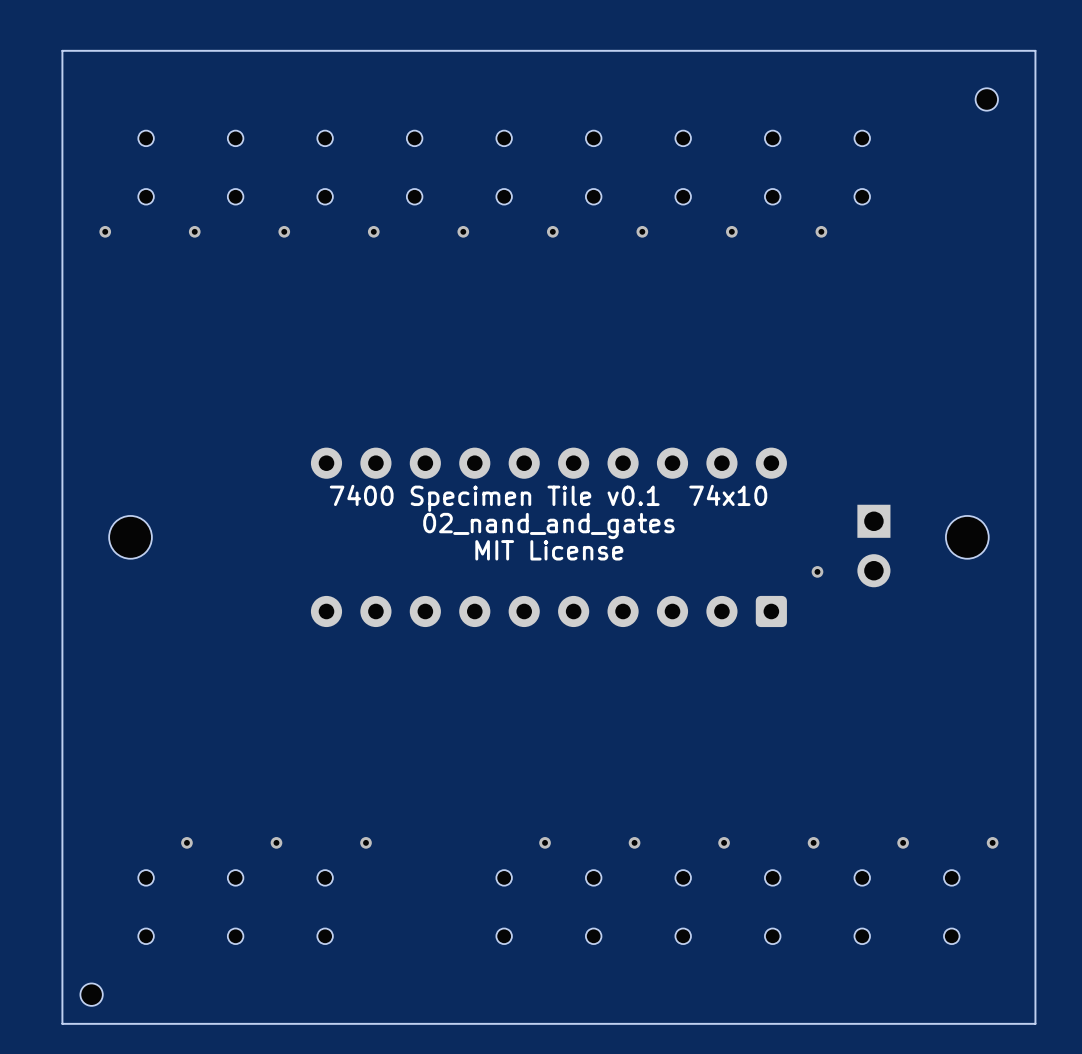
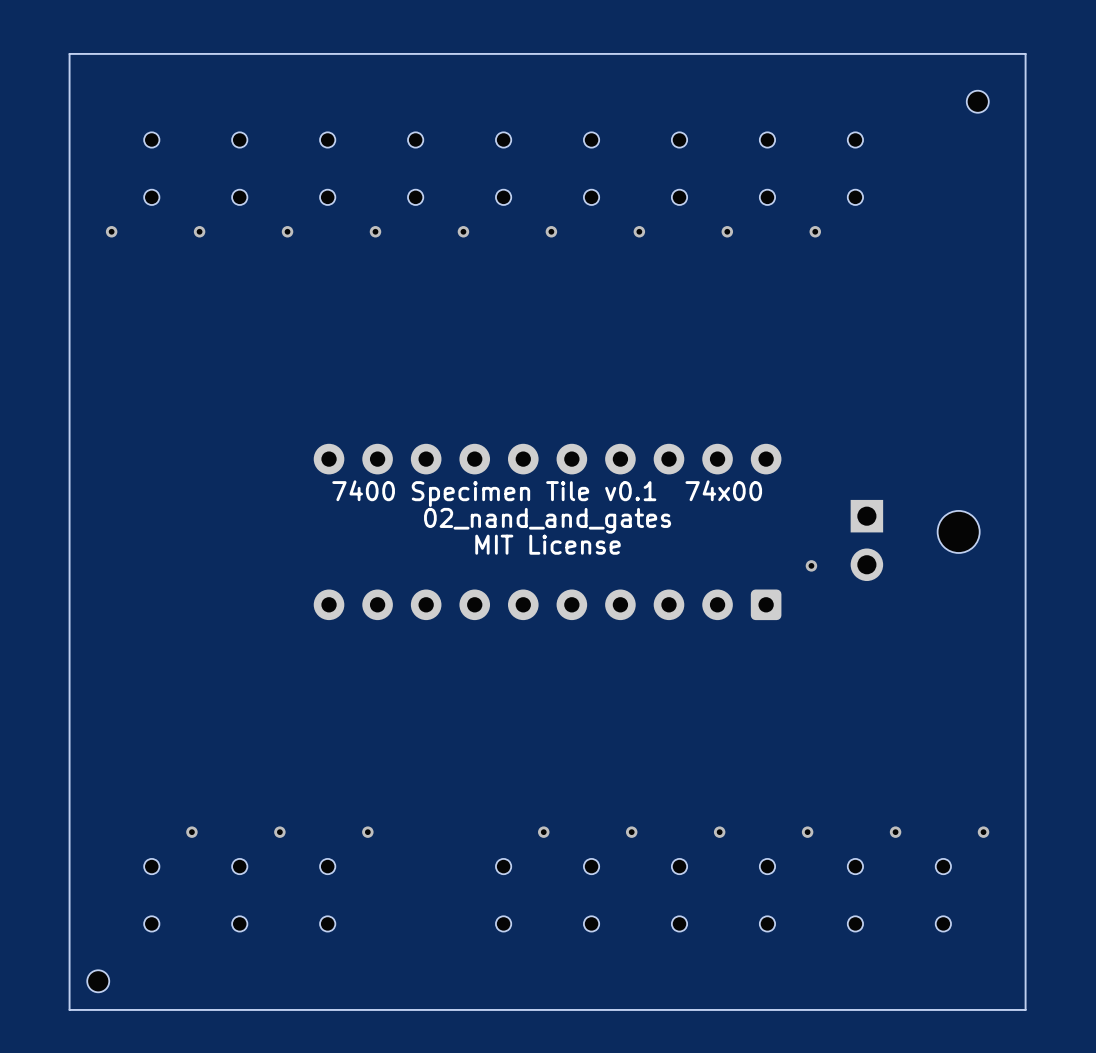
text: 7400 Specimen Tile v0.1 74x10 (548, 498) -> 7400 Specimen Tile v0.1 74x00 (547, 493)
part: (130, 537) -> none

